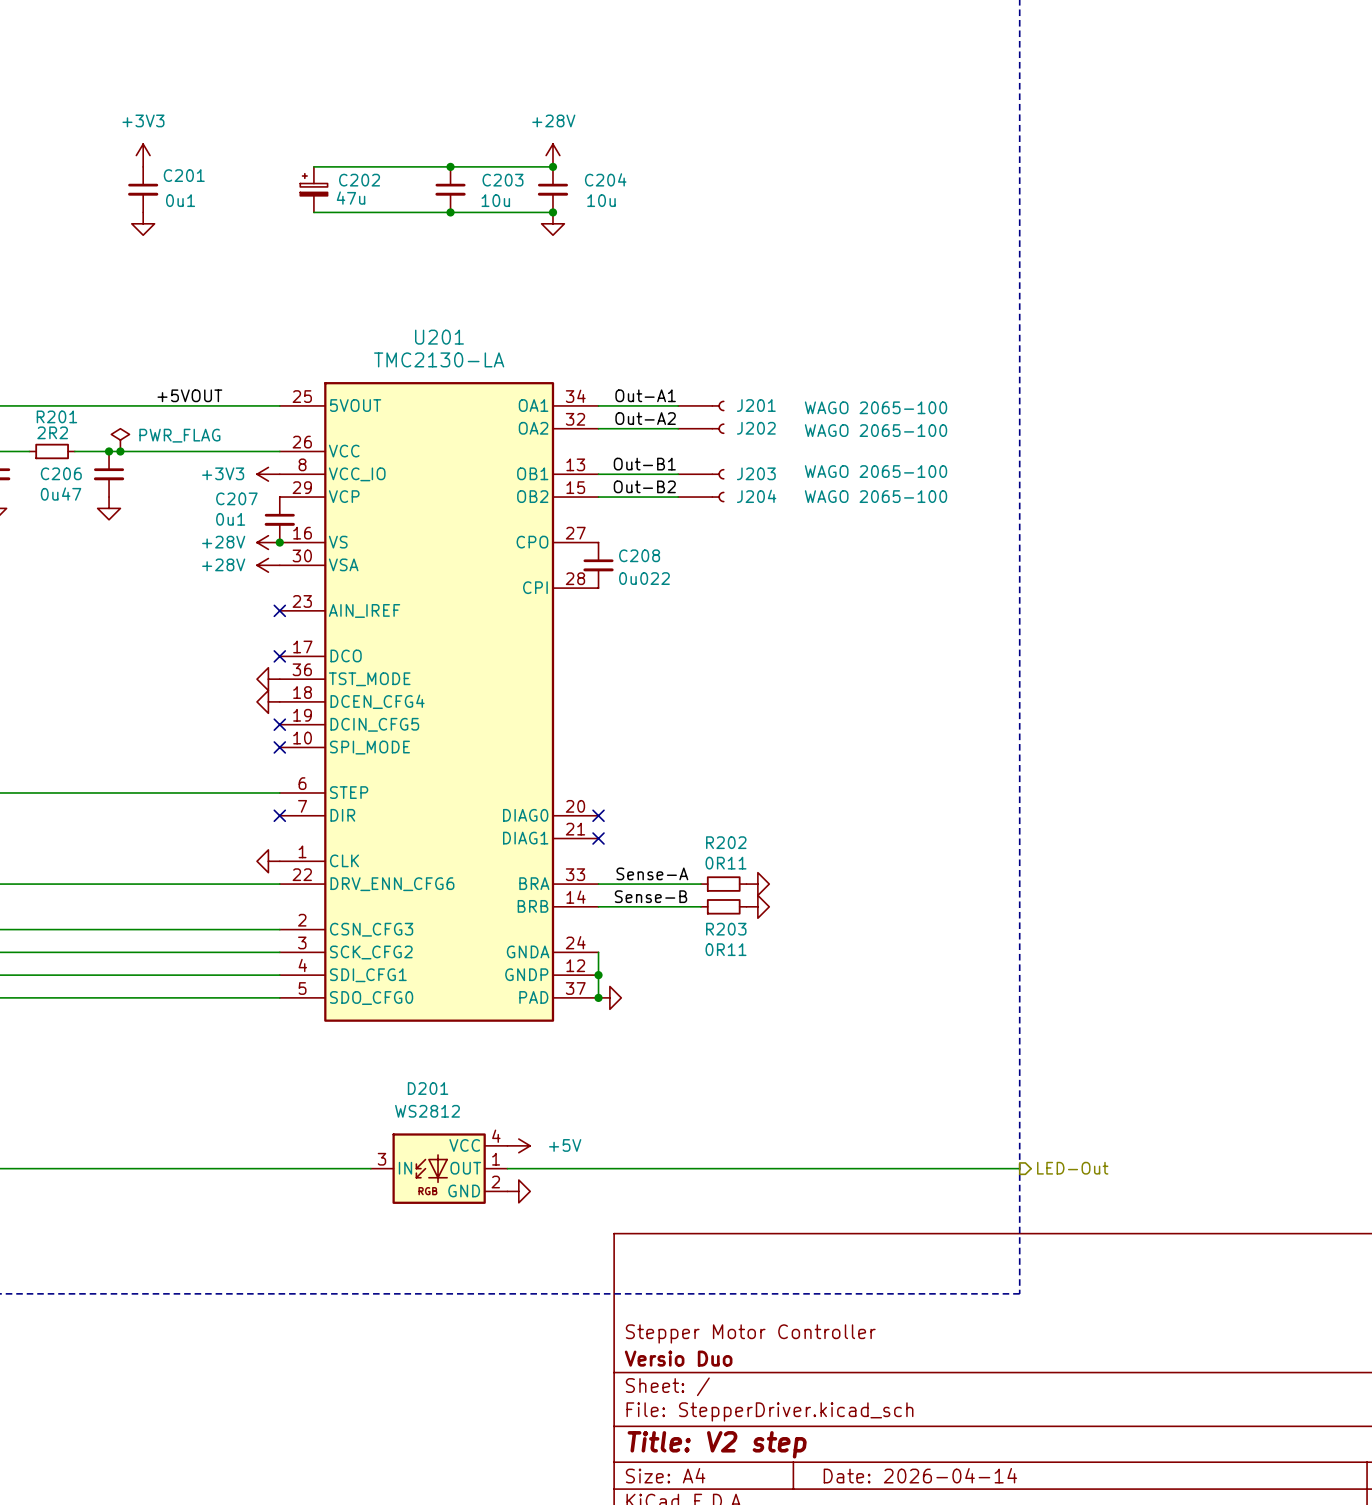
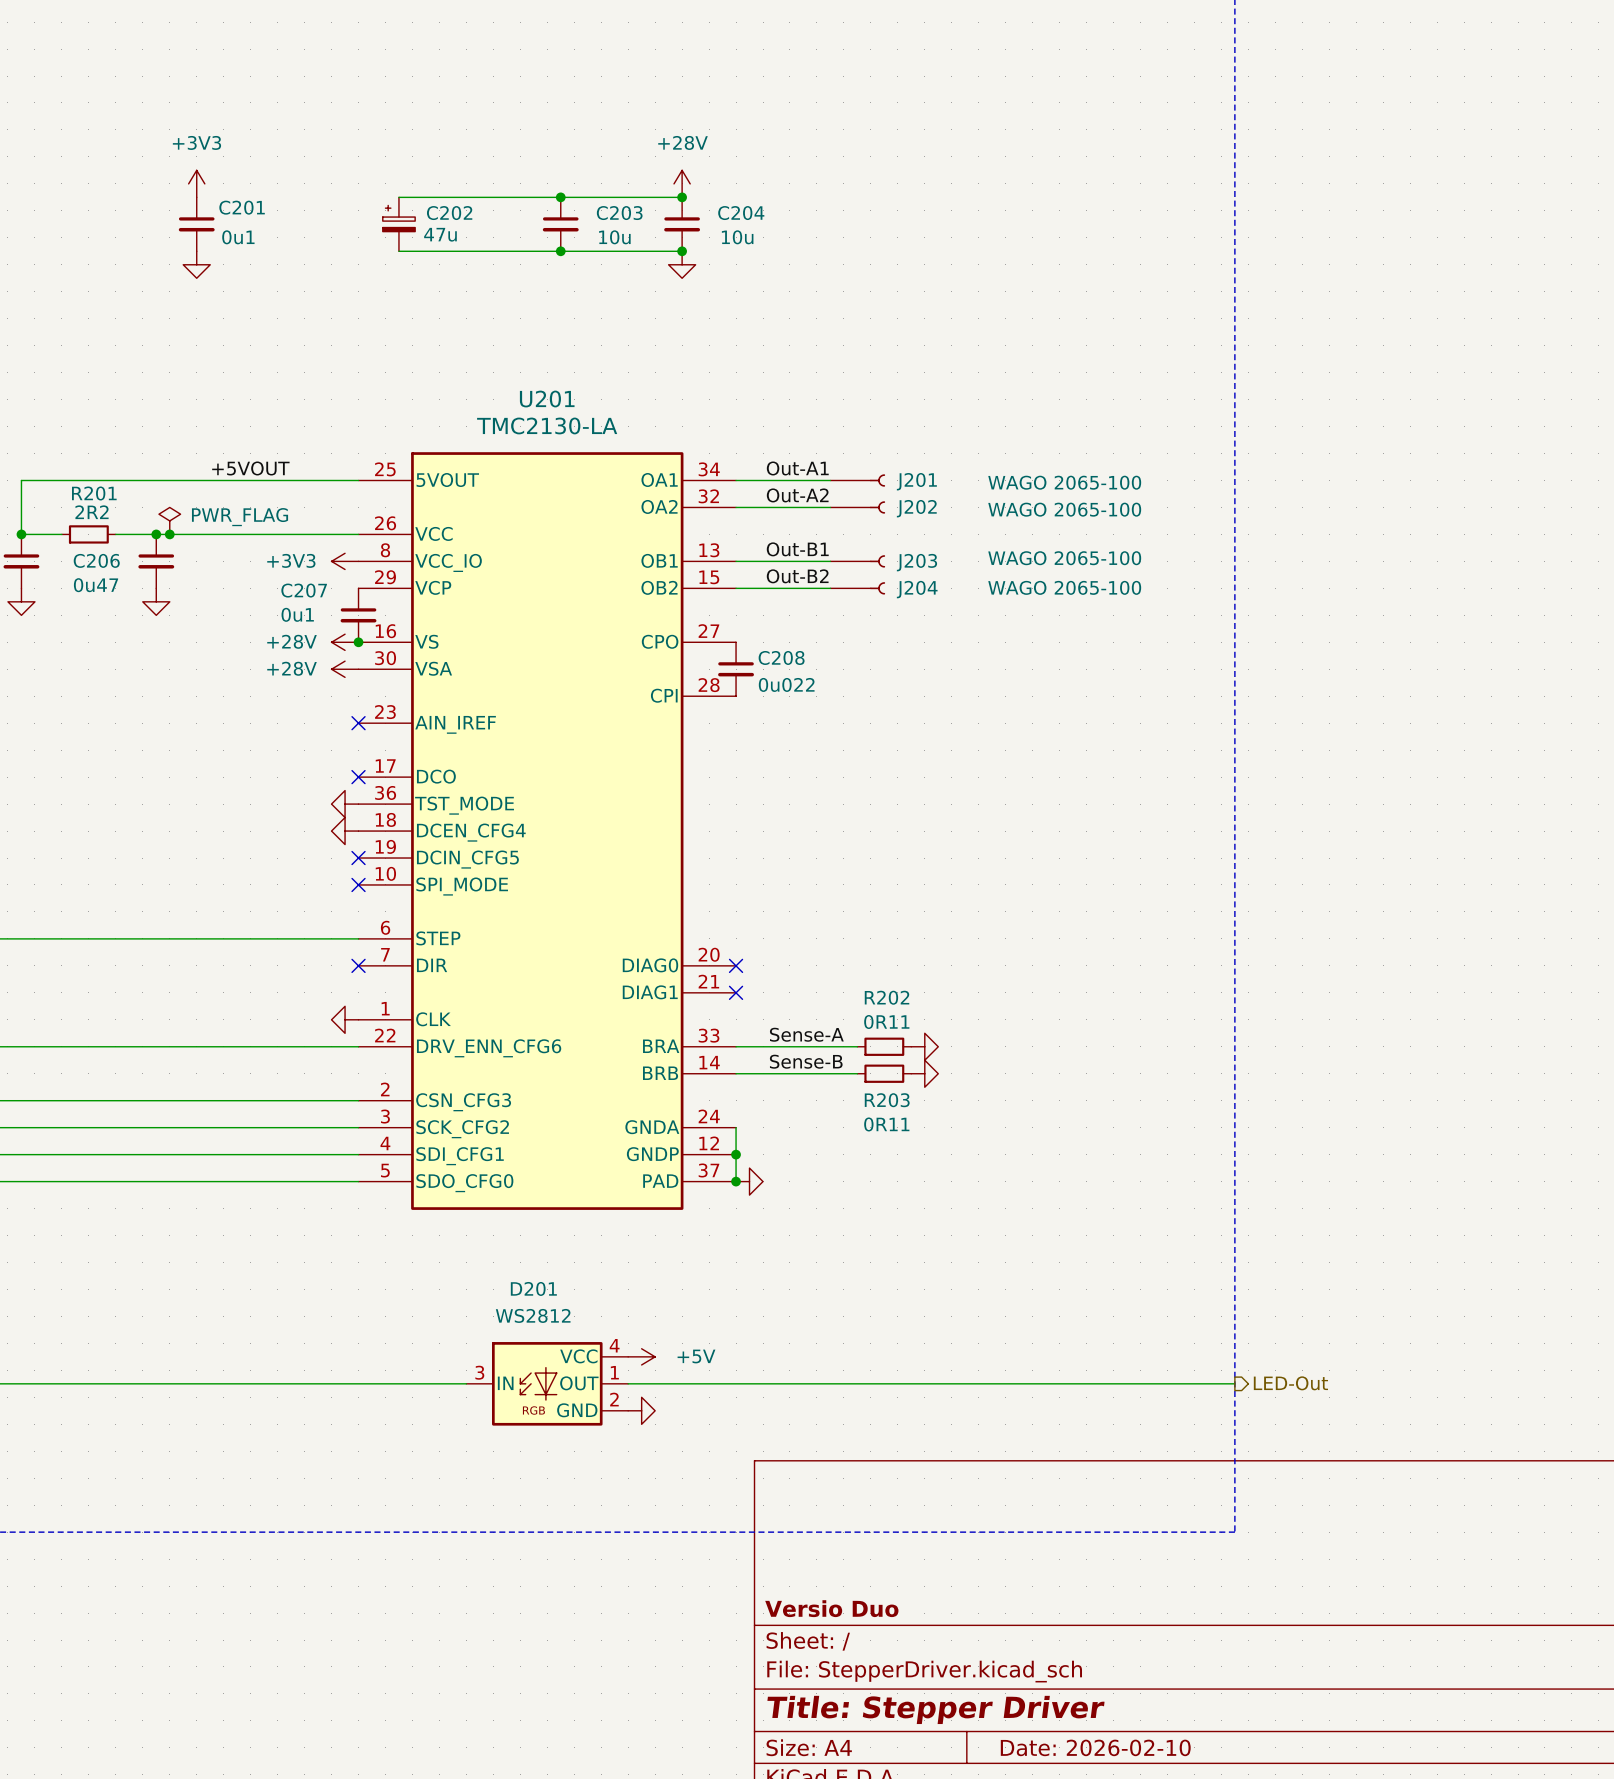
title block: Stepper Motor Controller (750, 1333) -> none
title block: Title: V2 step (717, 1444) -> Title: Stepper Driver (935, 1709)
title block: Date: 2026-04-14 (920, 1475) -> Date: 2026-02-10 (1095, 1747)

